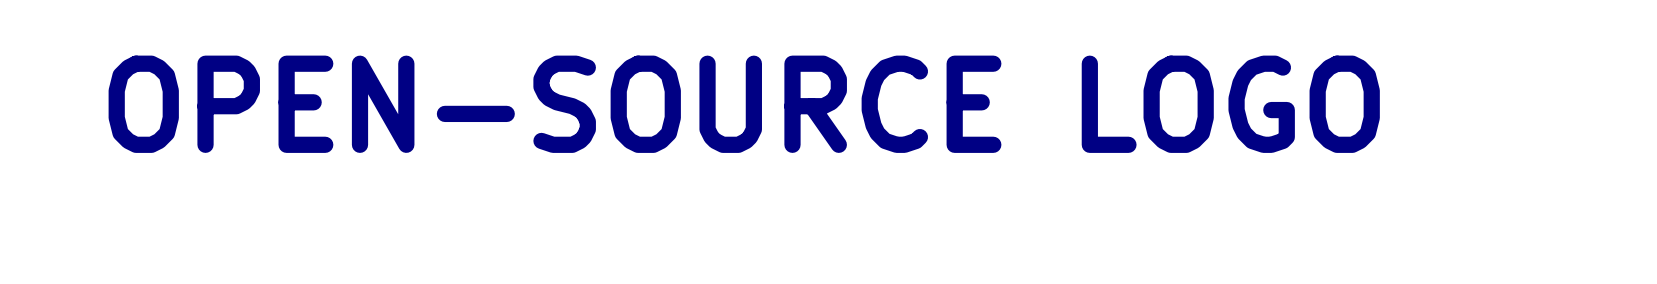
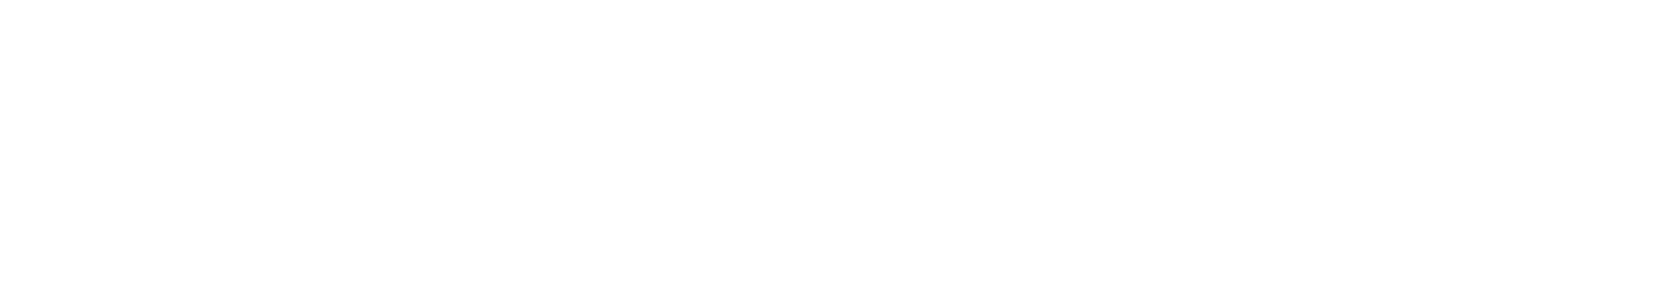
text: OPEN-SOURCE LOGO (744, 104) -> none

